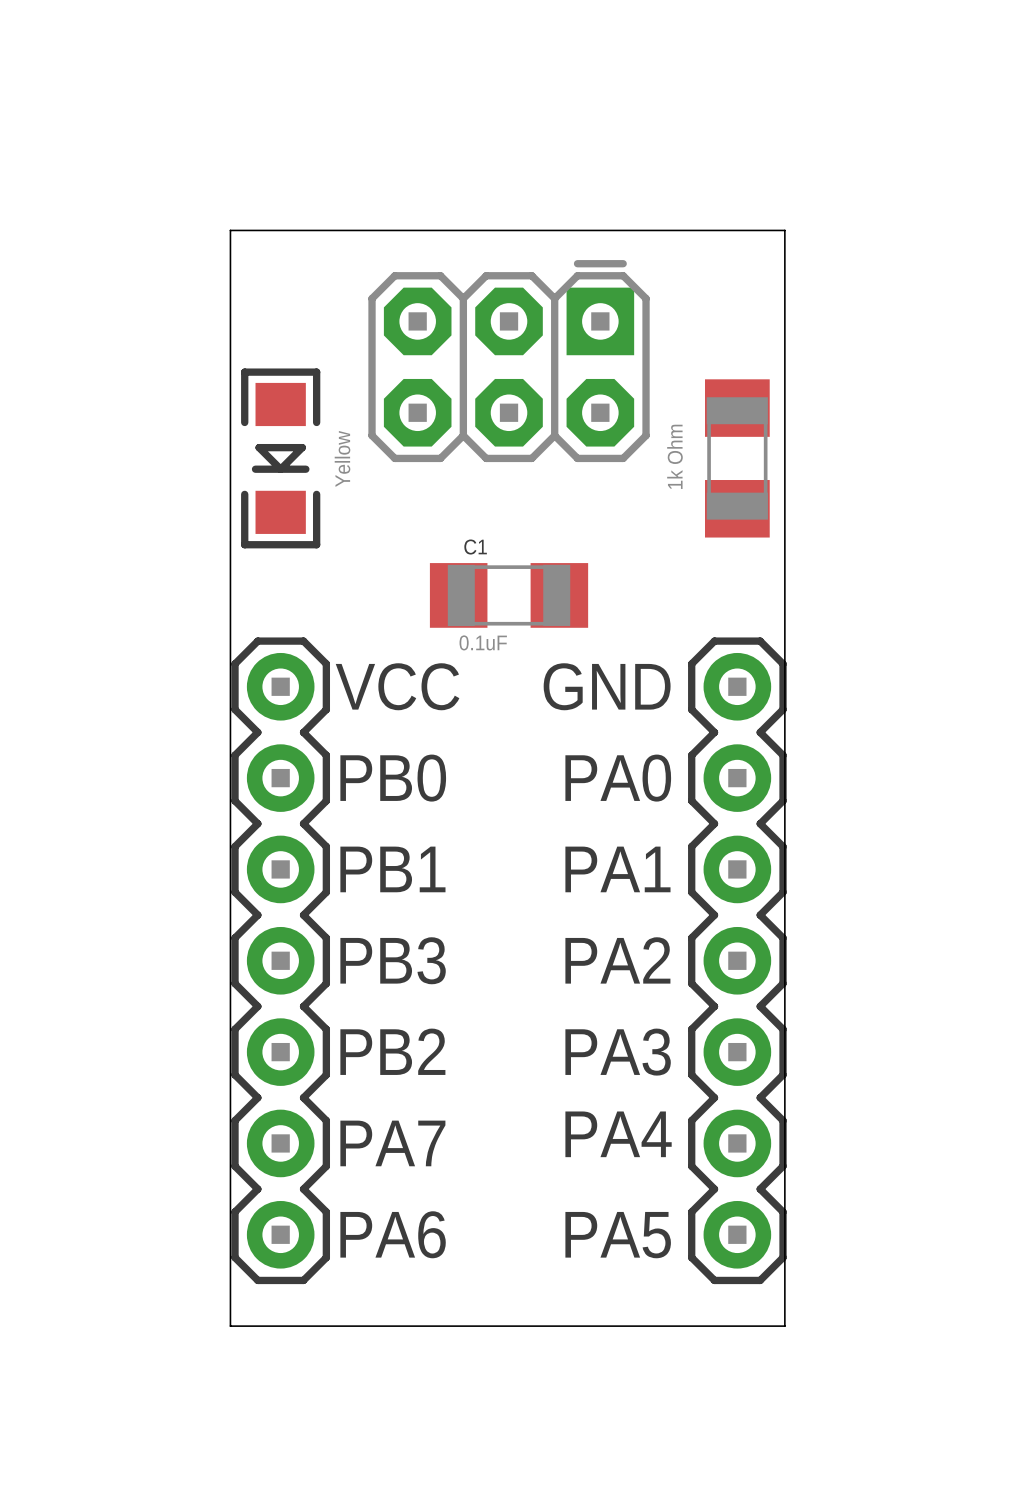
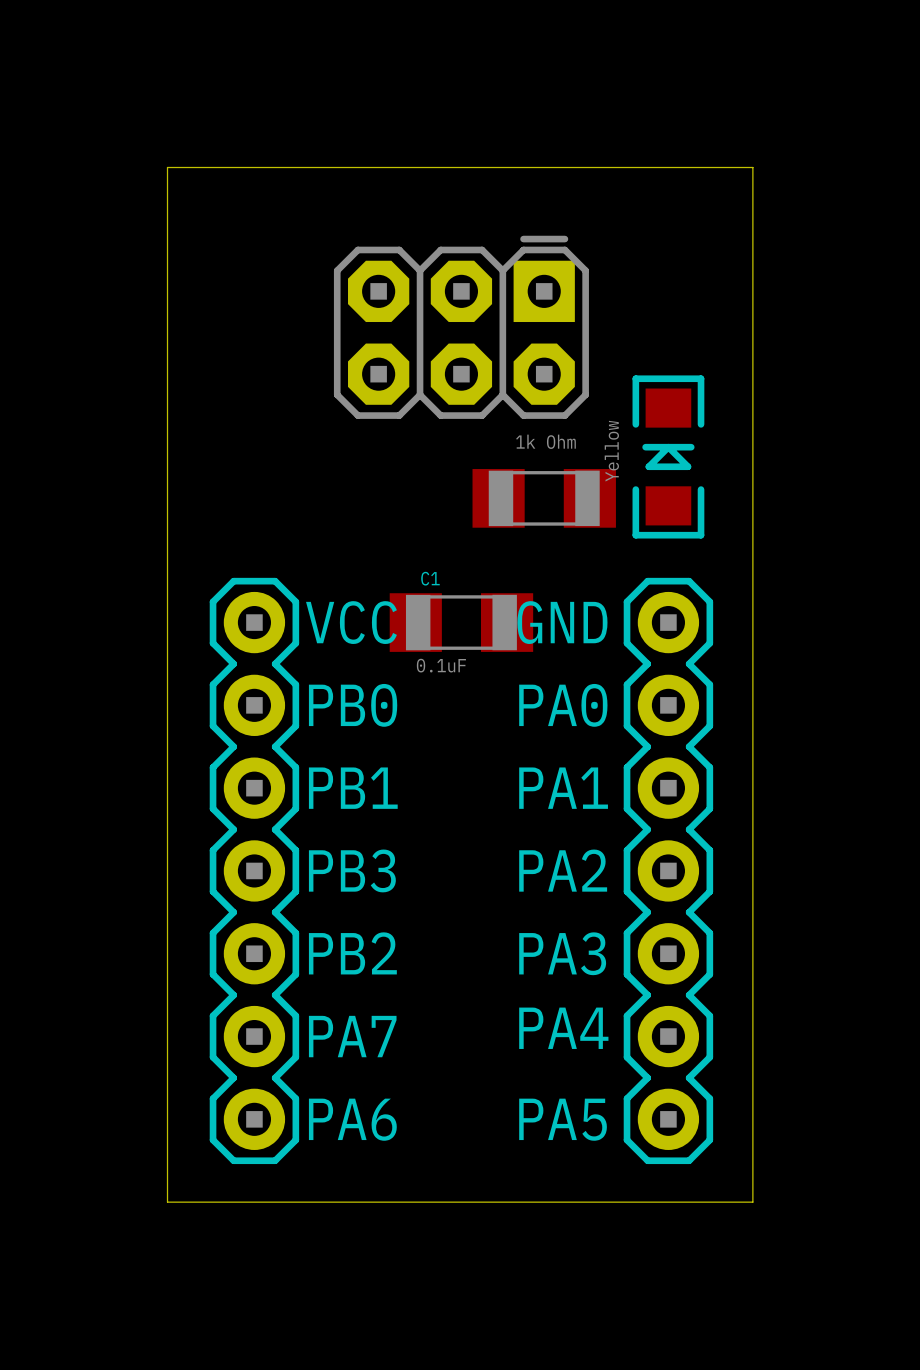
part rotation: 0° (280, 458) -> 180° (668, 456)
part position: (280, 458) -> (668, 456)
part rotation: 0° (737, 458) -> 90° clockwise (544, 498)
part position: (737, 458) -> (544, 498)
C1 position: (509, 595) -> (461, 622)
board edge: (230, 1326) (230, 230) (784, 230) (784, 1326) -> (208, 1202) (167, 1202) (167, 167) (752, 167) (752, 1202) (711, 1202)

